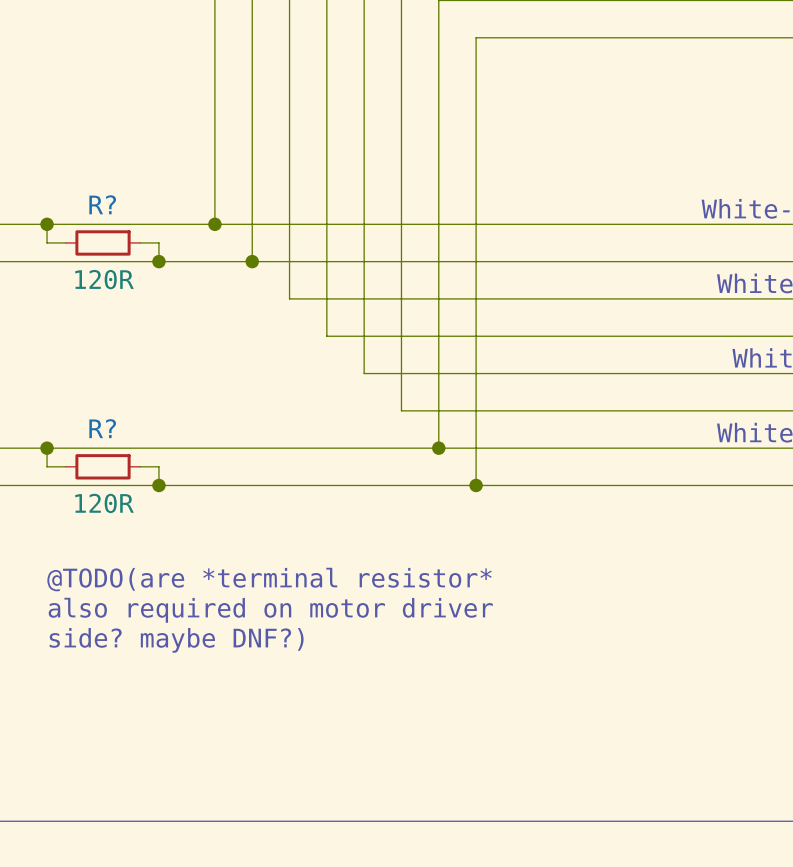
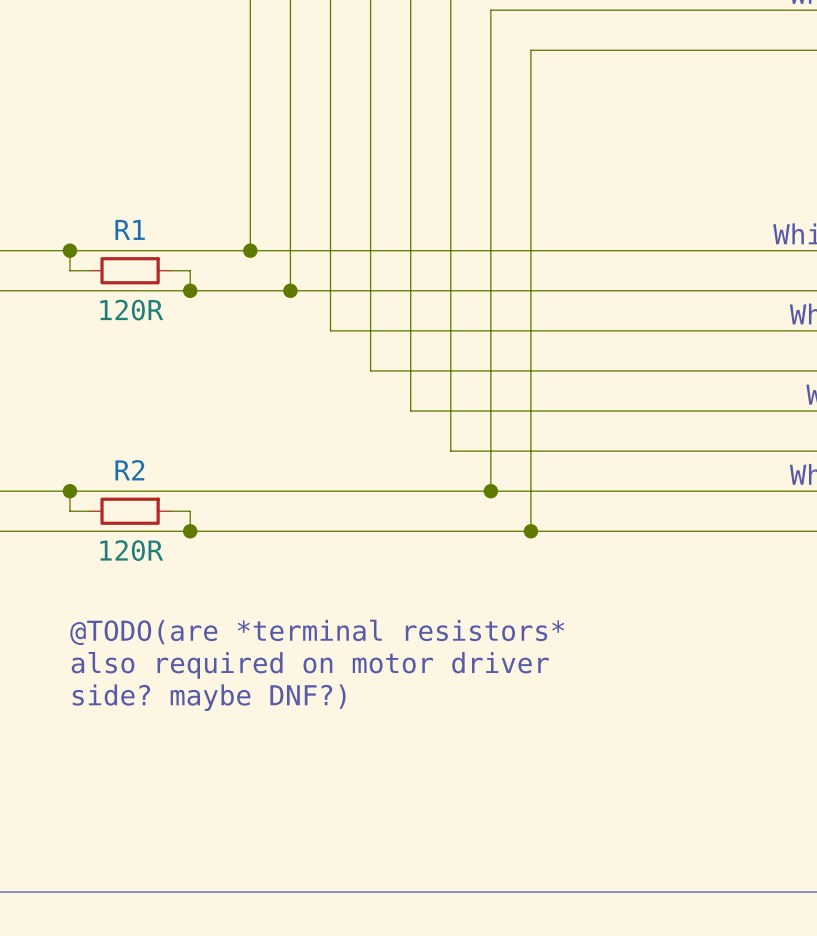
R? name: R? (102, 204) -> R1 (130, 229)
R? name: R? (102, 428) -> R2 (129, 470)
text: @TODO(are *terminal resistor* (269, 579) -> @TODO(are *terminal resistors* (317, 632)

